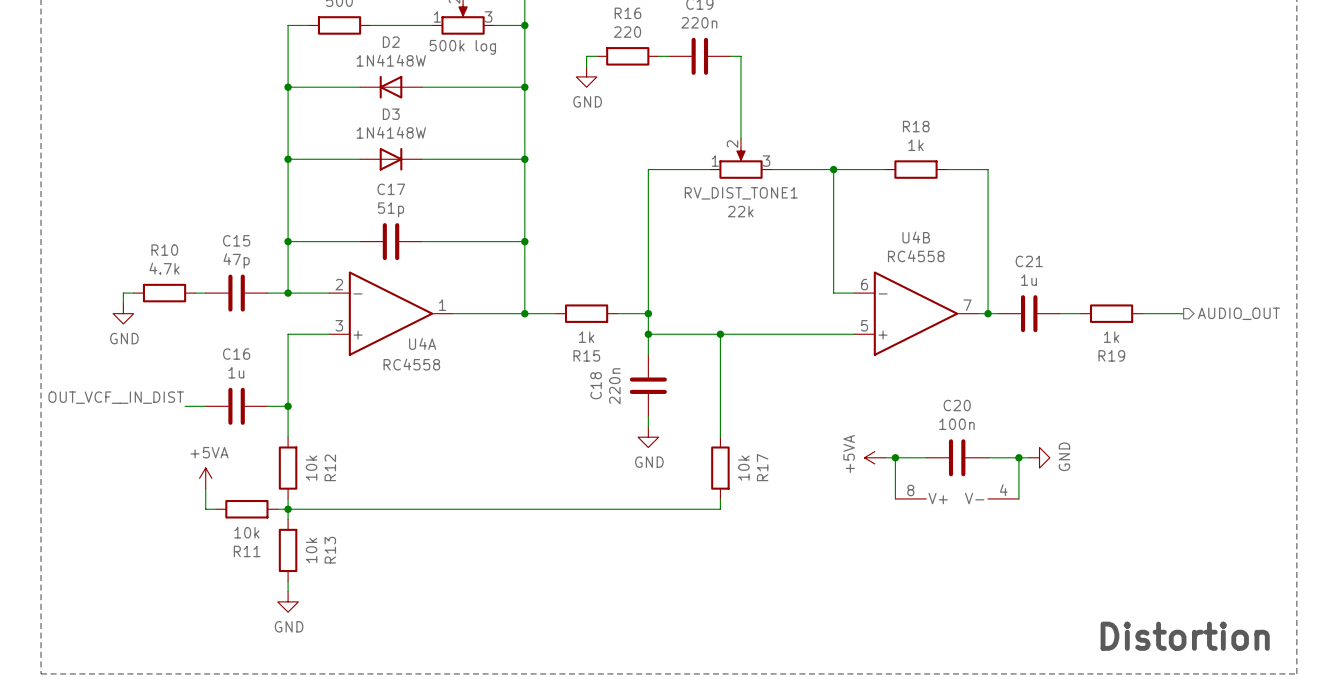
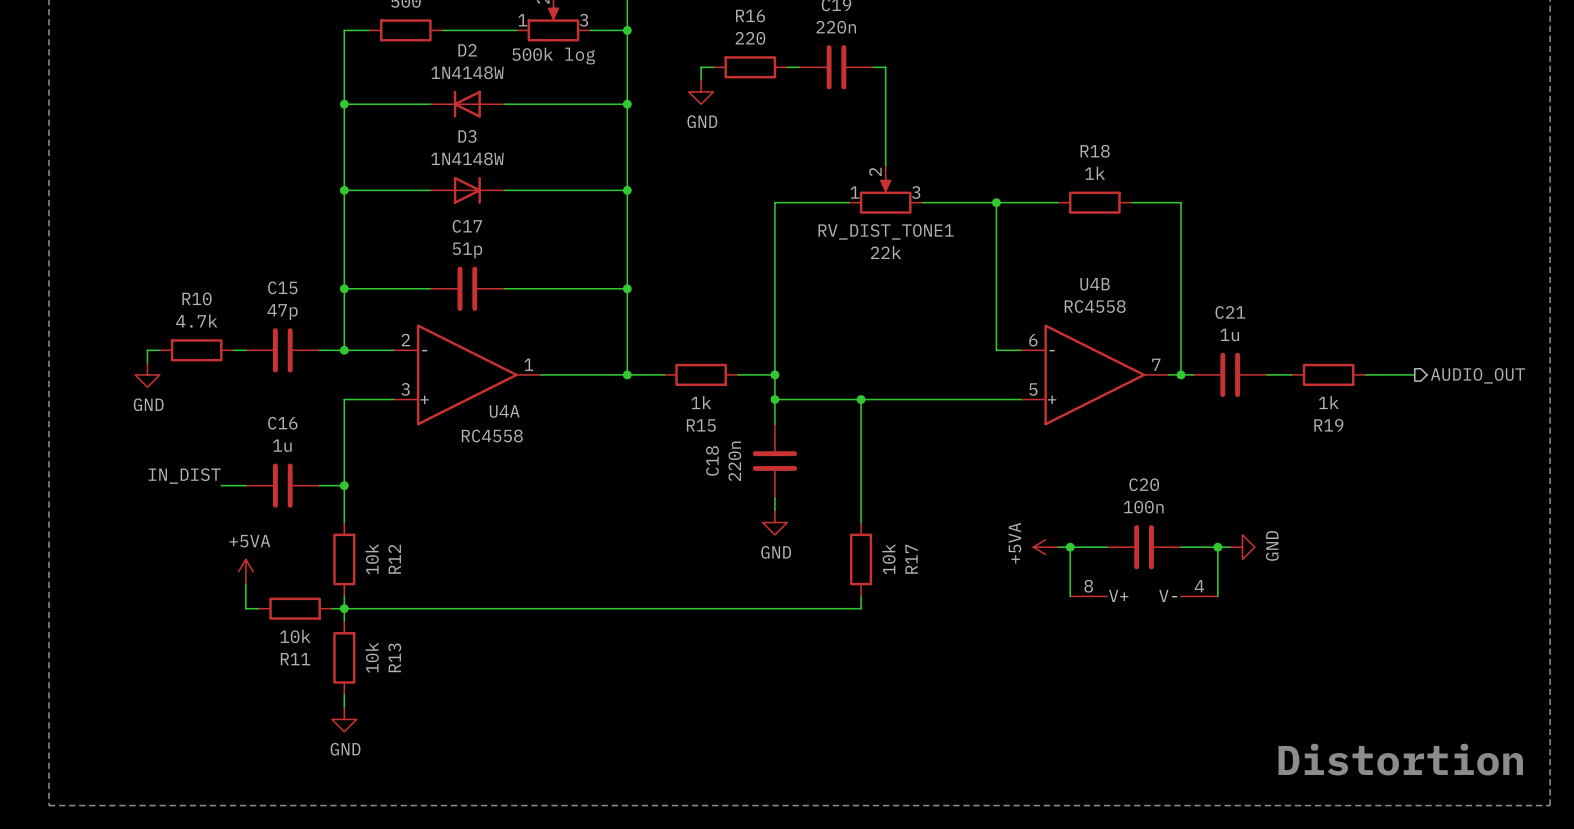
label: OUT_VCF__IN_DIST (116, 397) -> IN_DIST (184, 476)

